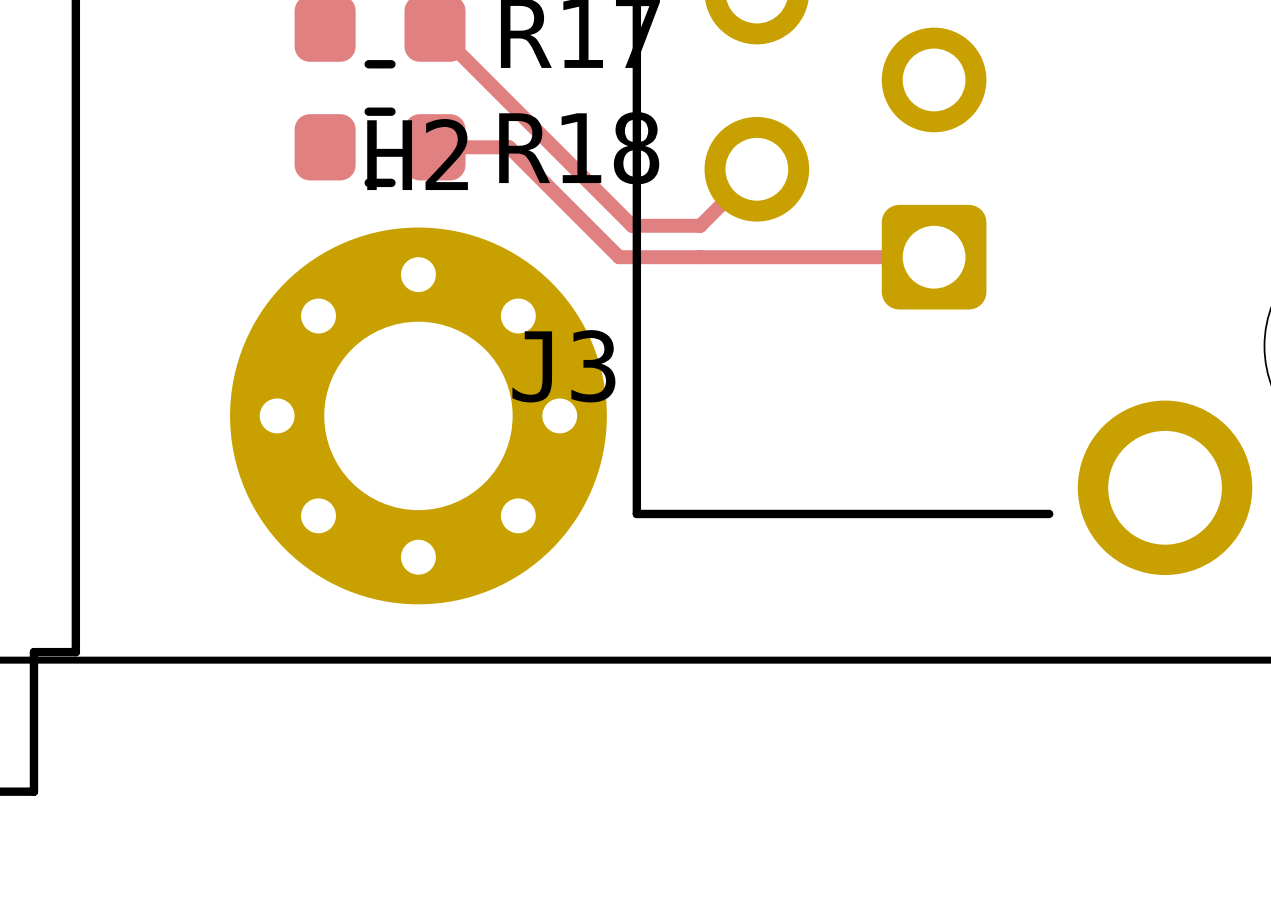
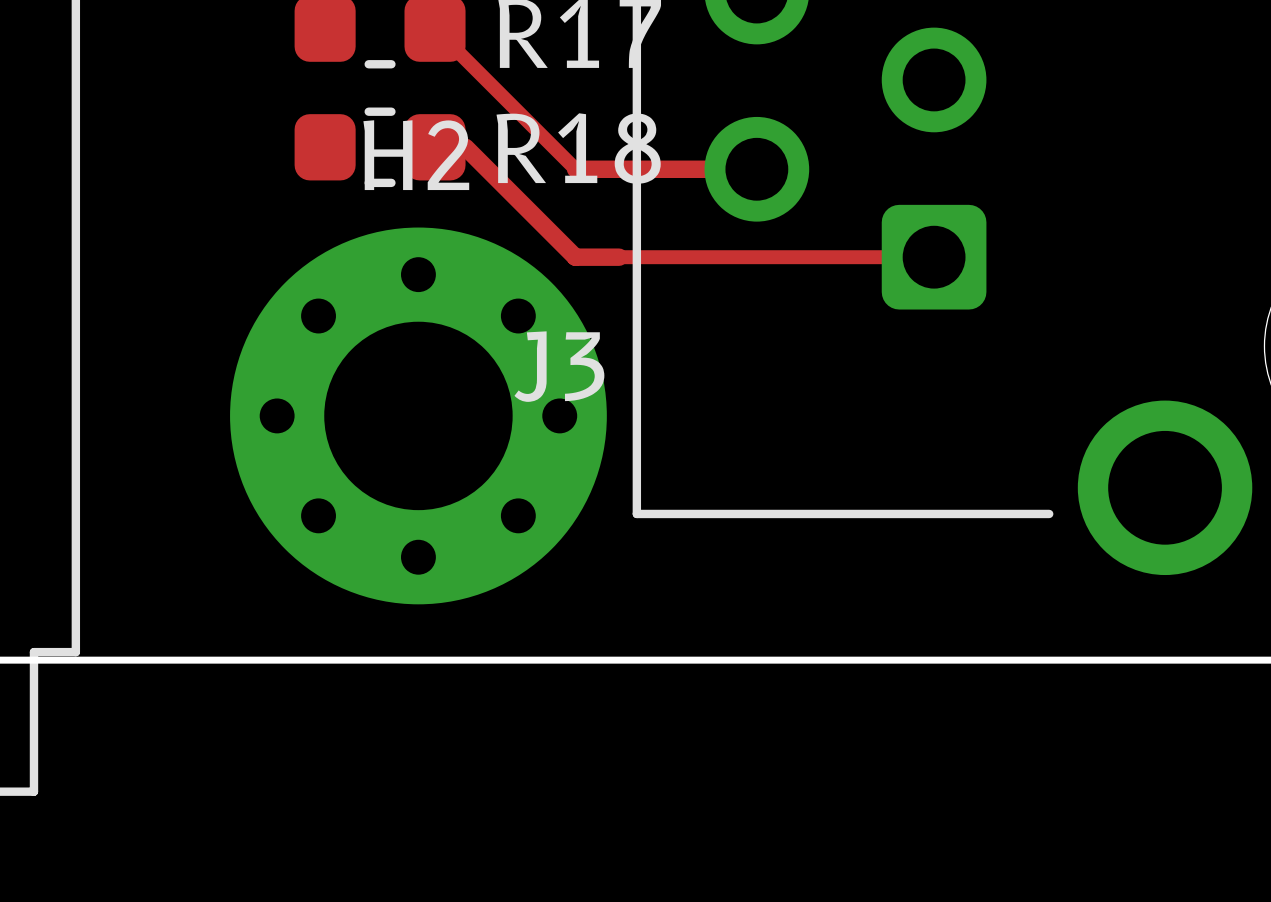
track: (465, 147) (509, 147) (619, 257) -> (465, 147) (575, 257) (619, 257)
track: (575, 169) (632, 225) (700, 225) (756, 169) -> (575, 169) (756, 169)

